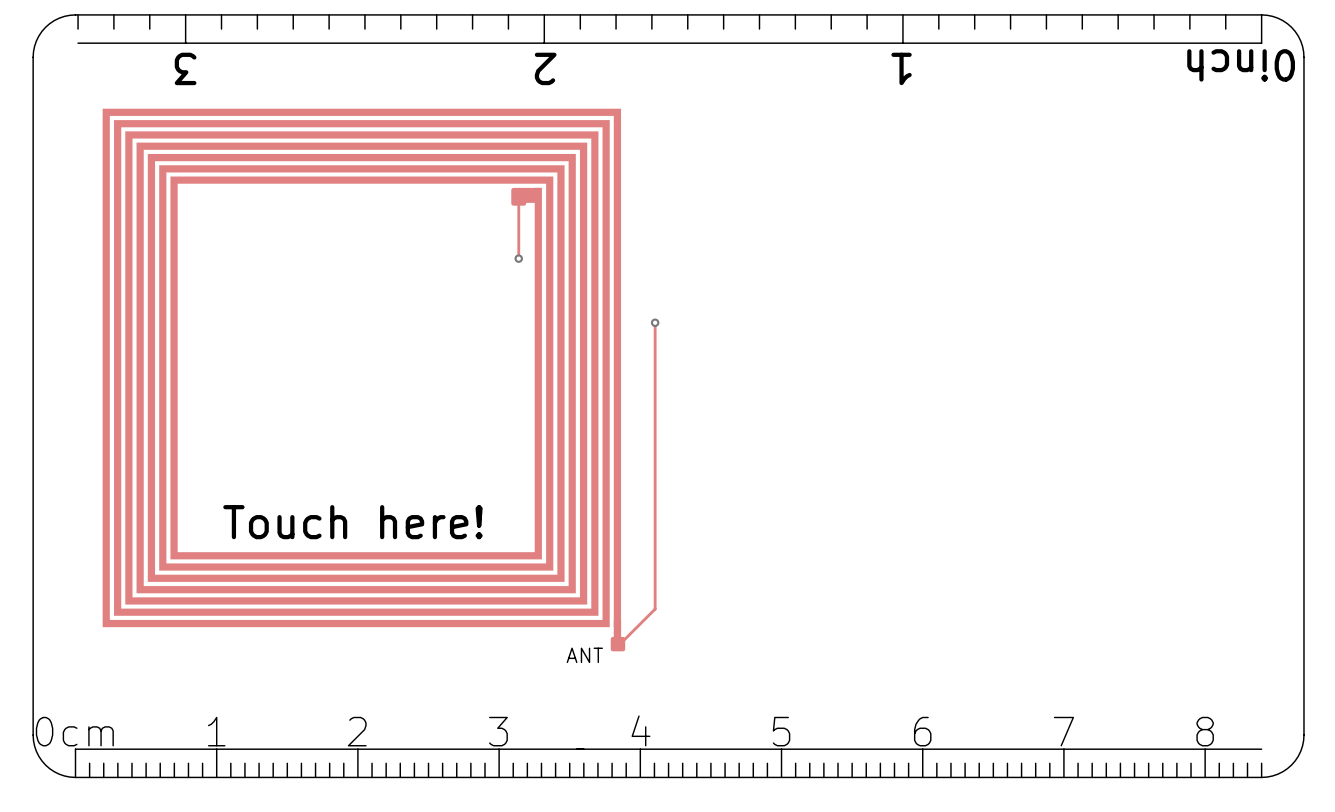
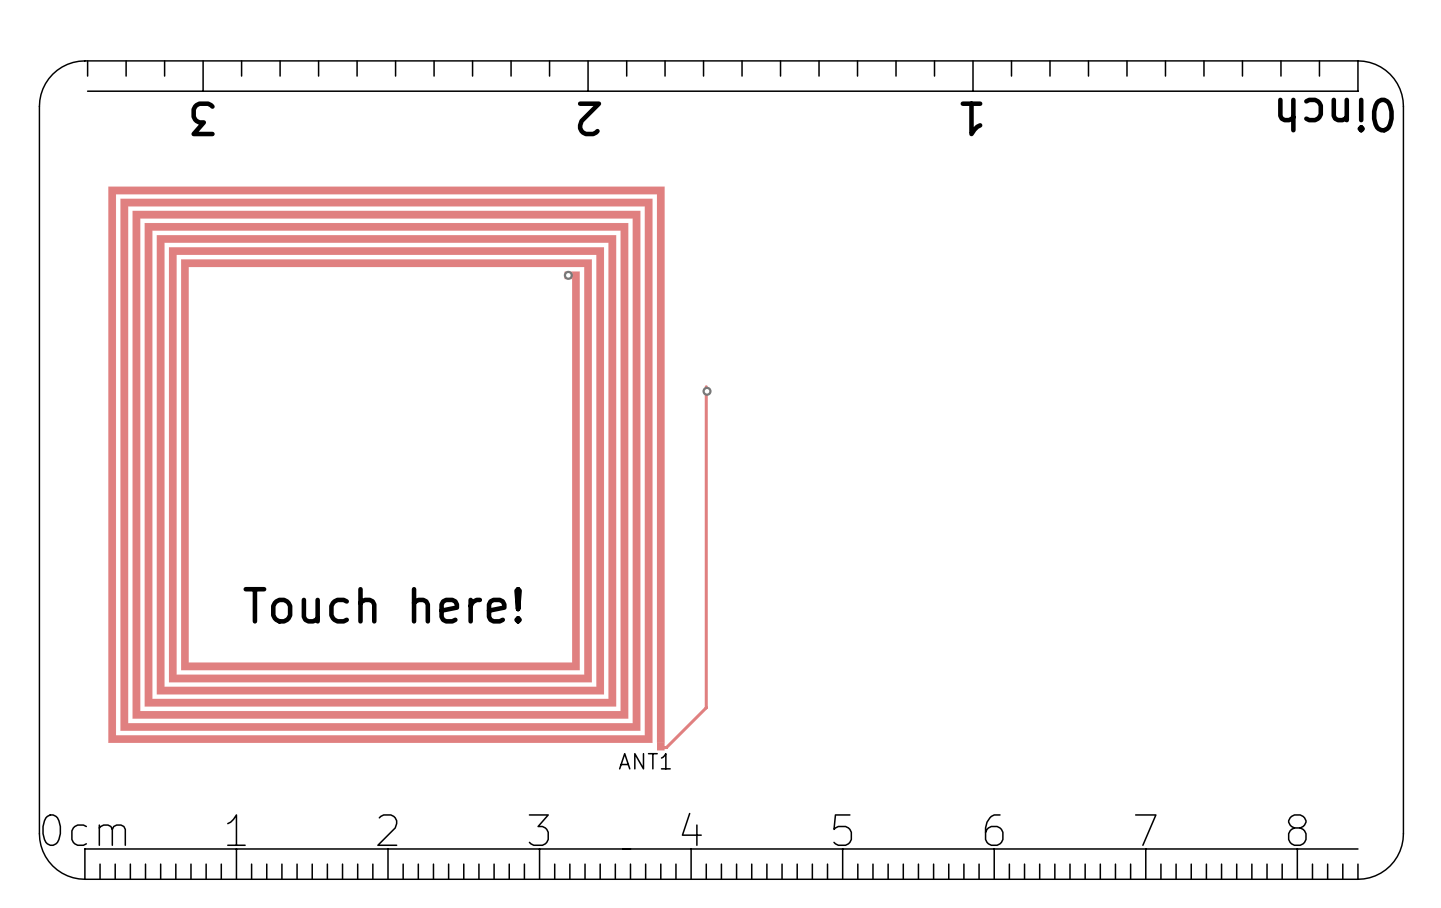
track: (518, 196) (518, 258) -> none
via position: (518, 258) -> (568, 275)
track: none -> (706, 386) (706, 707) (666, 747) (660, 747)
track: (655, 322) (655, 609) (617, 644) -> none
ANT: (363, 380) -> none
ANT1: none -> (386, 468)

